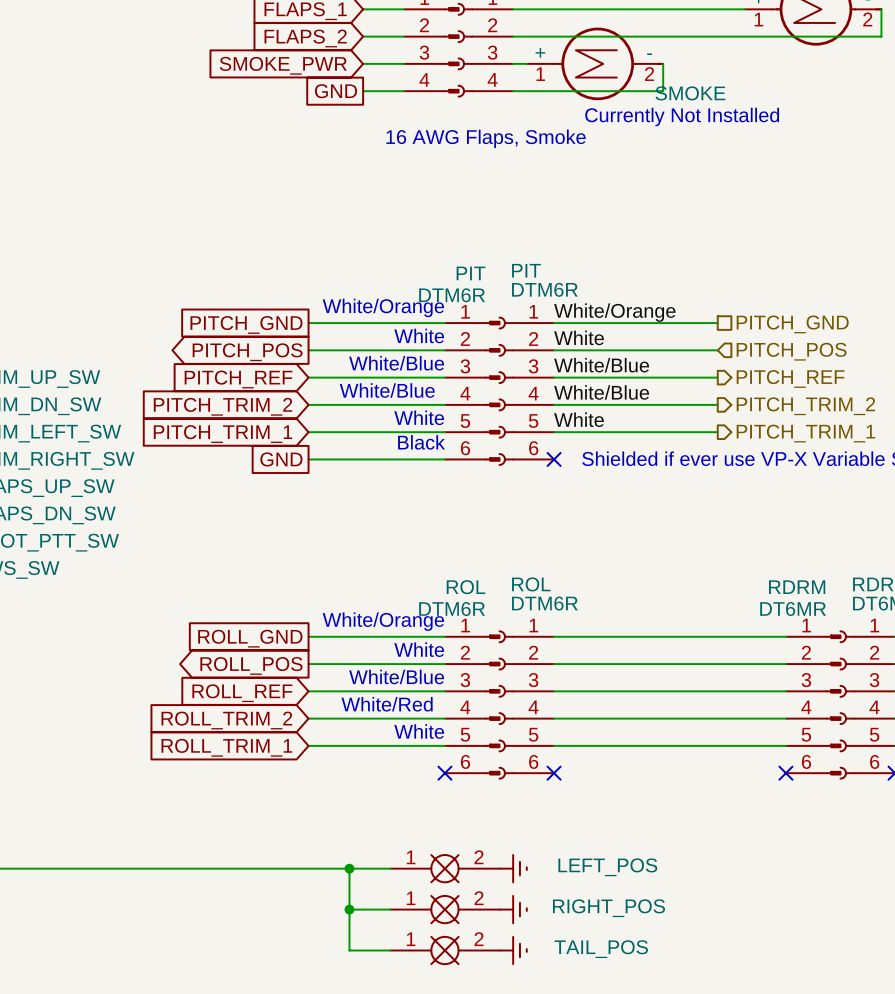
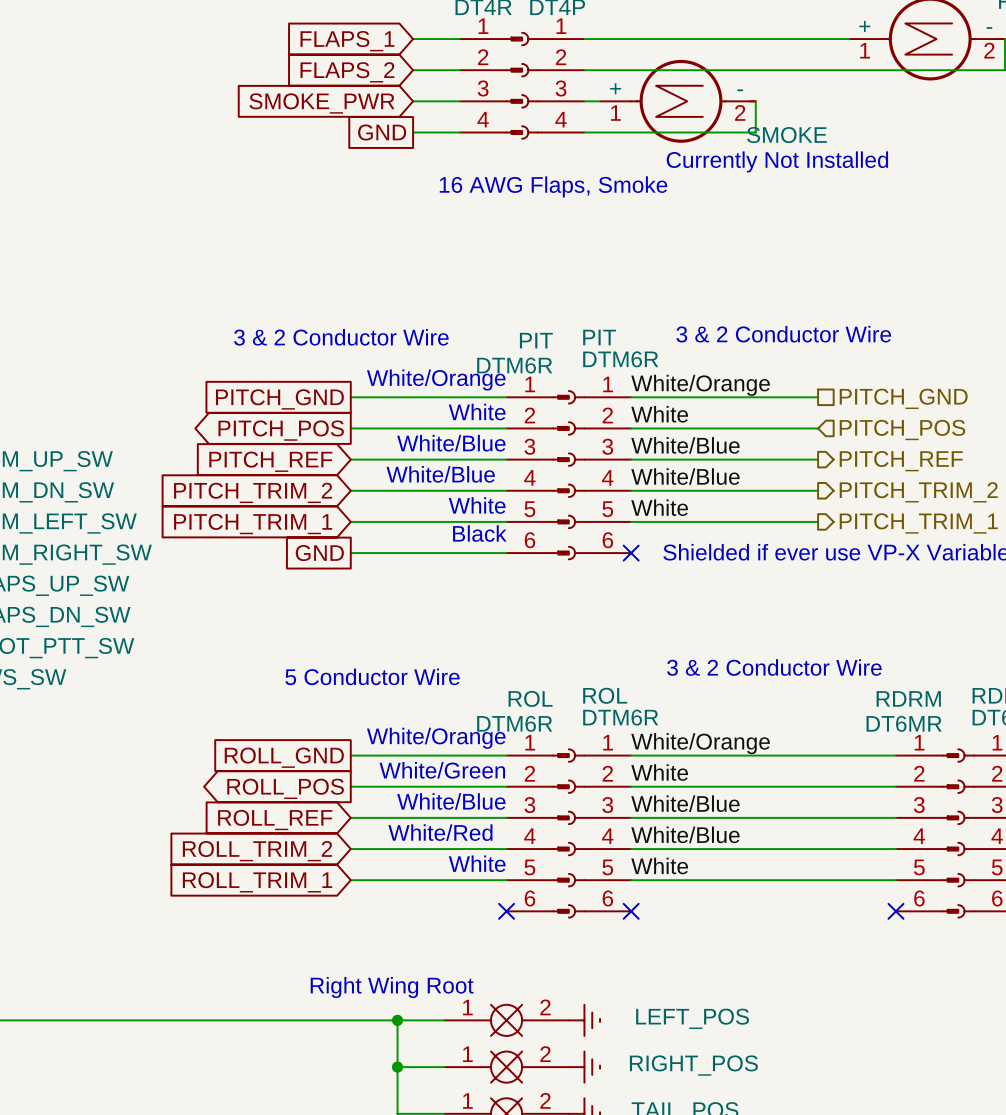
text: none -> 3 & 2 Conductor Wire (783, 334)
text: none -> 3 & 2 Conductor Wire (341, 337)
text: none -> 3 & 2 Conductor Wire (774, 667)
text: none -> 5 Conductor Wire (372, 676)
label: none -> White/Orange (700, 743)
text: White (419, 649) -> White/Green (442, 770)
label: none -> White (659, 772)
label: none -> White/Blue (685, 803)
label: none -> White/Blue (685, 834)
label: none -> White (659, 865)
text: none -> Right Wing Root (392, 987)

